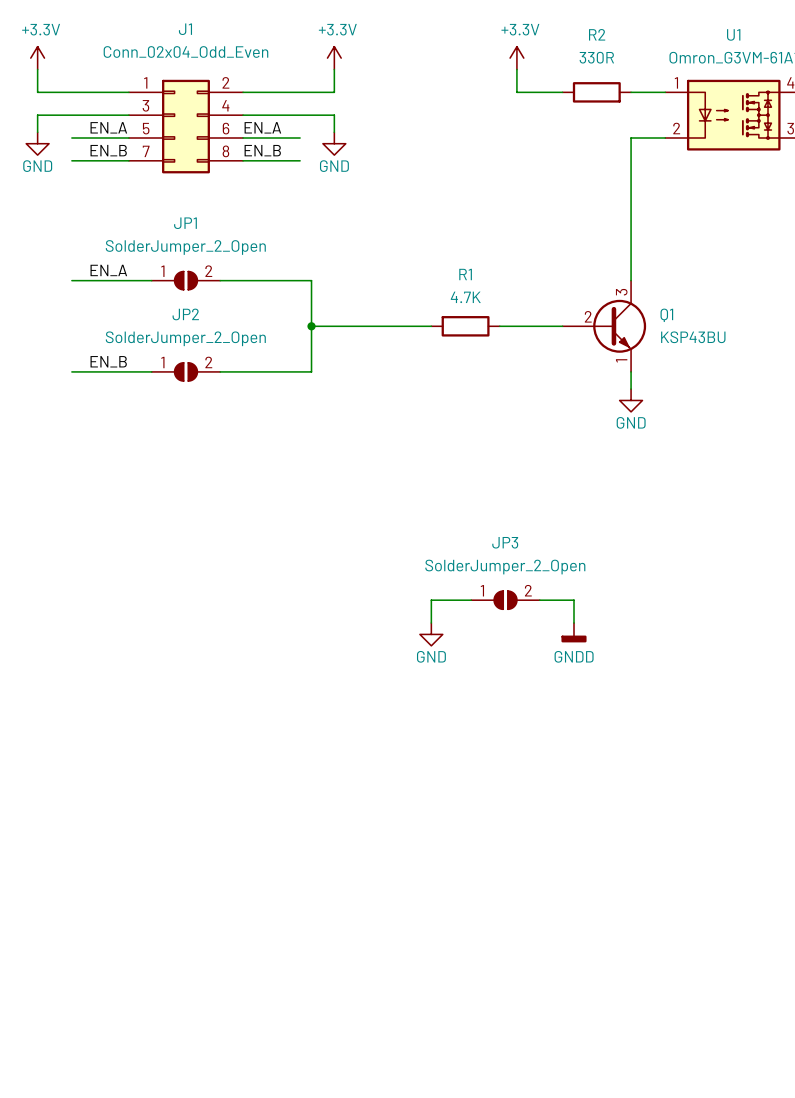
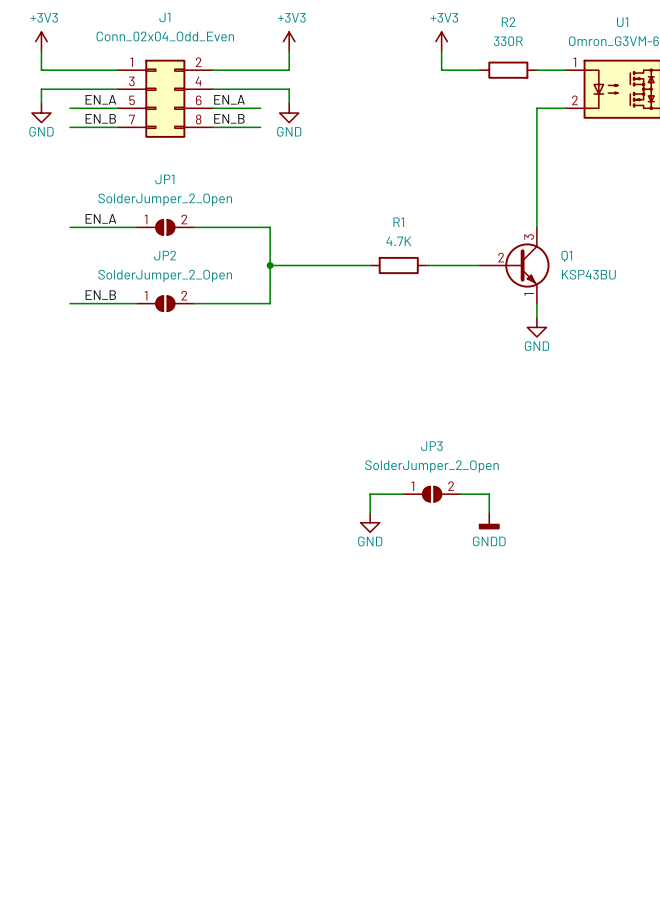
power symbol: +3.3V (37, 58) -> +3V3 (41, 41)
power symbol: +3.3V (334, 58) -> +3V3 (289, 41)
power symbol: +3.3V (516, 58) -> +3V3 (441, 41)

